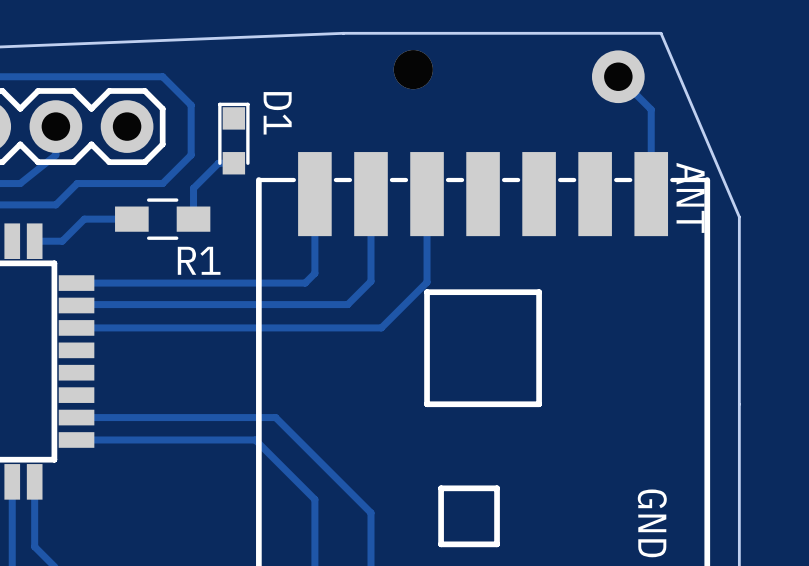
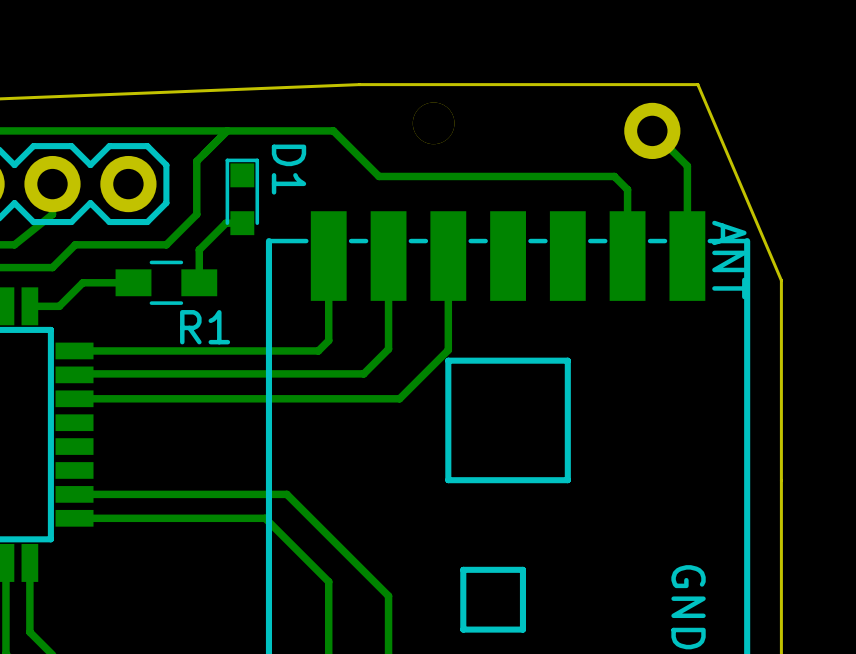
track: (162, 76) (191, 105) -> (227, 130) (196, 161)
track: none -> (166, 130) (333, 130) (378, 176) (614, 176) (627, 189) (627, 256)

